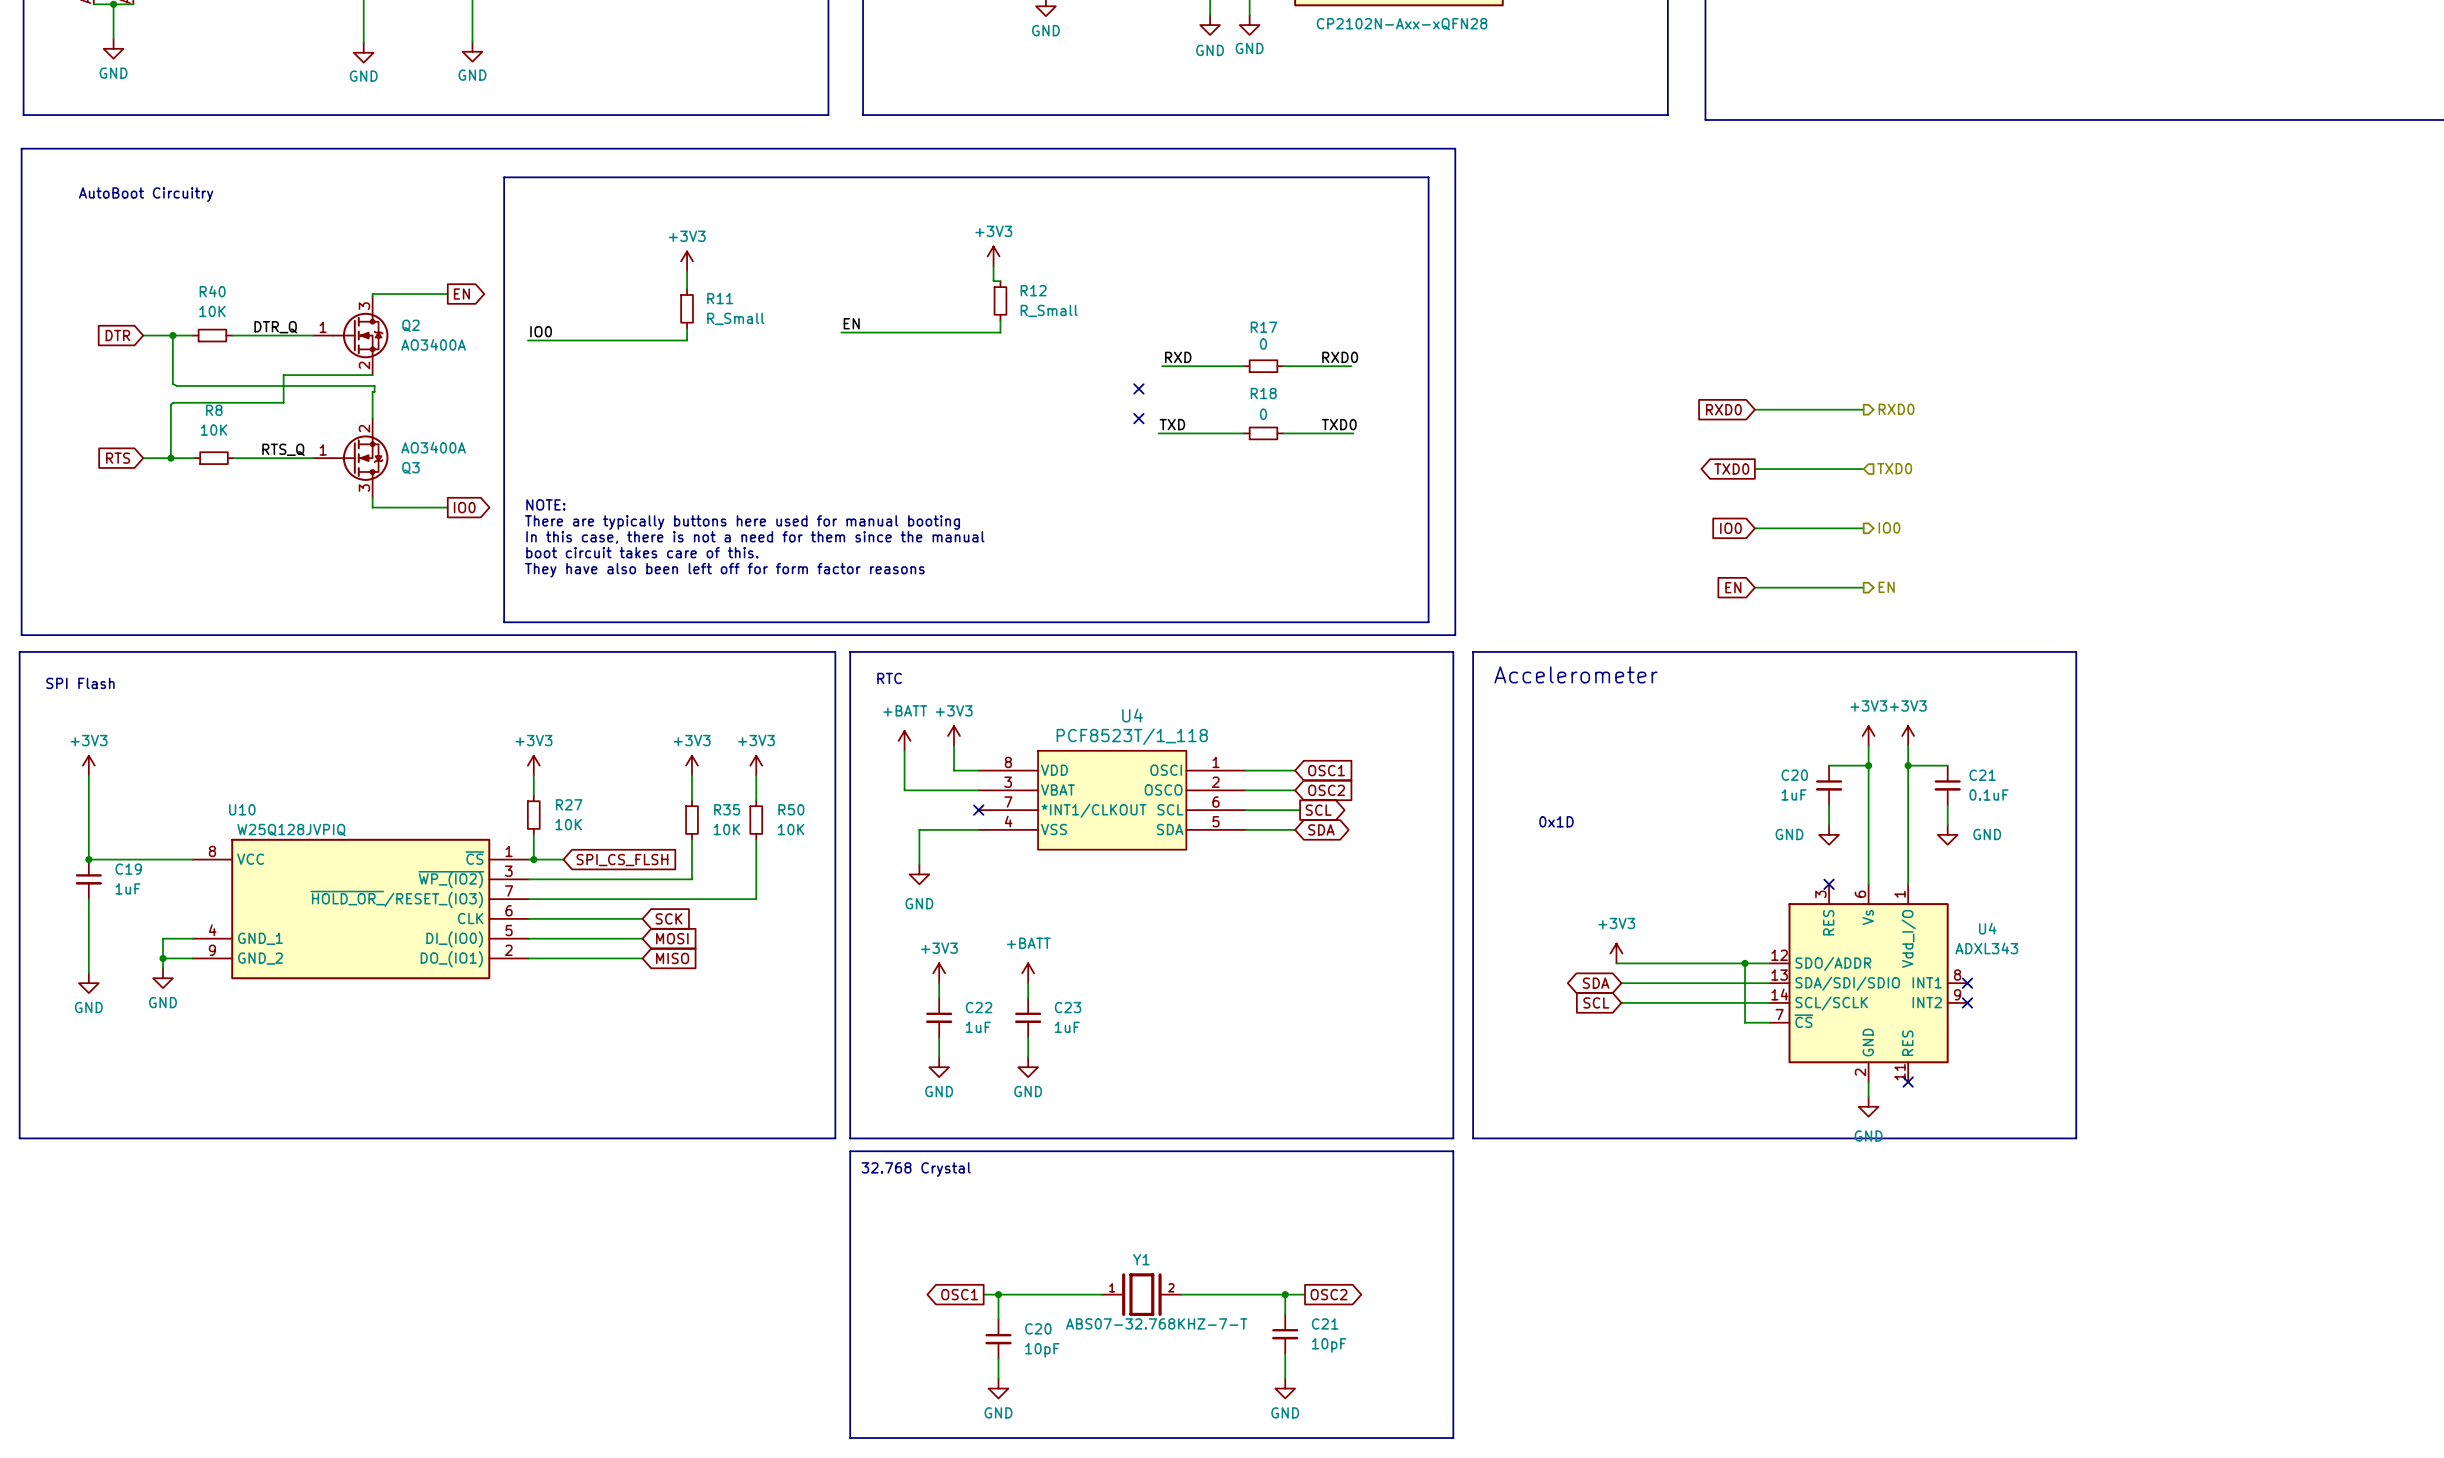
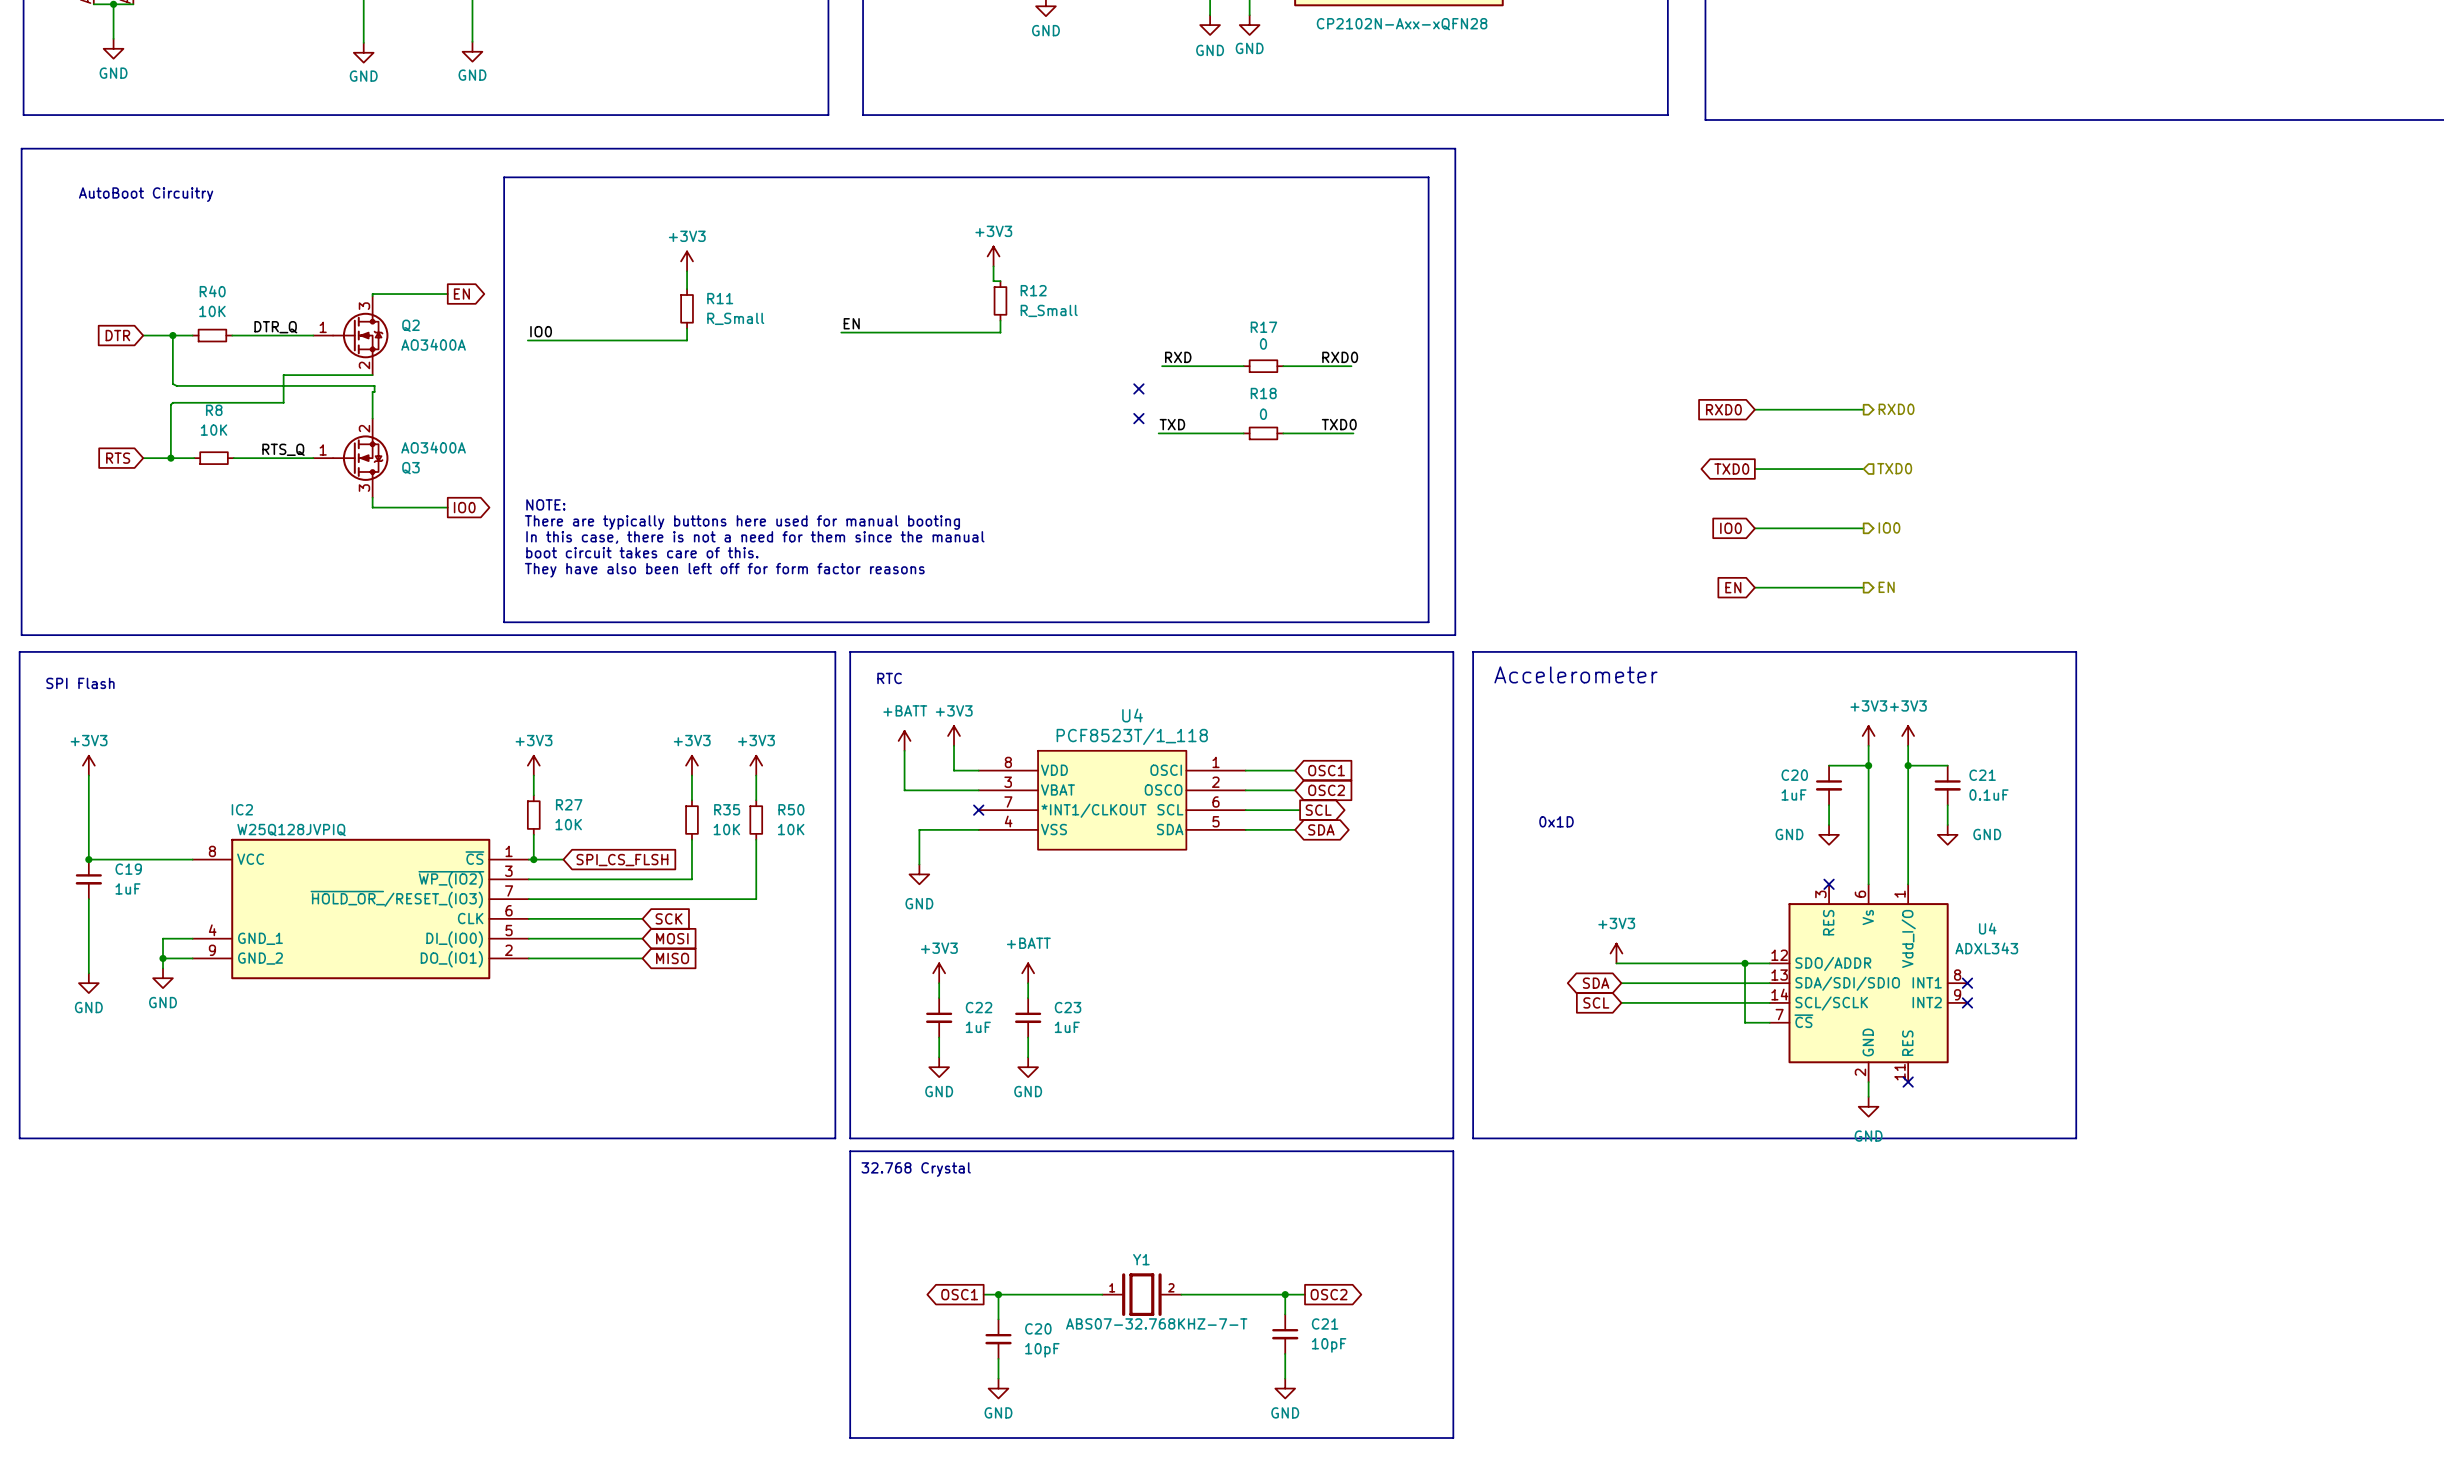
U10 name: U10 (242, 809) -> IC2 (242, 809)

